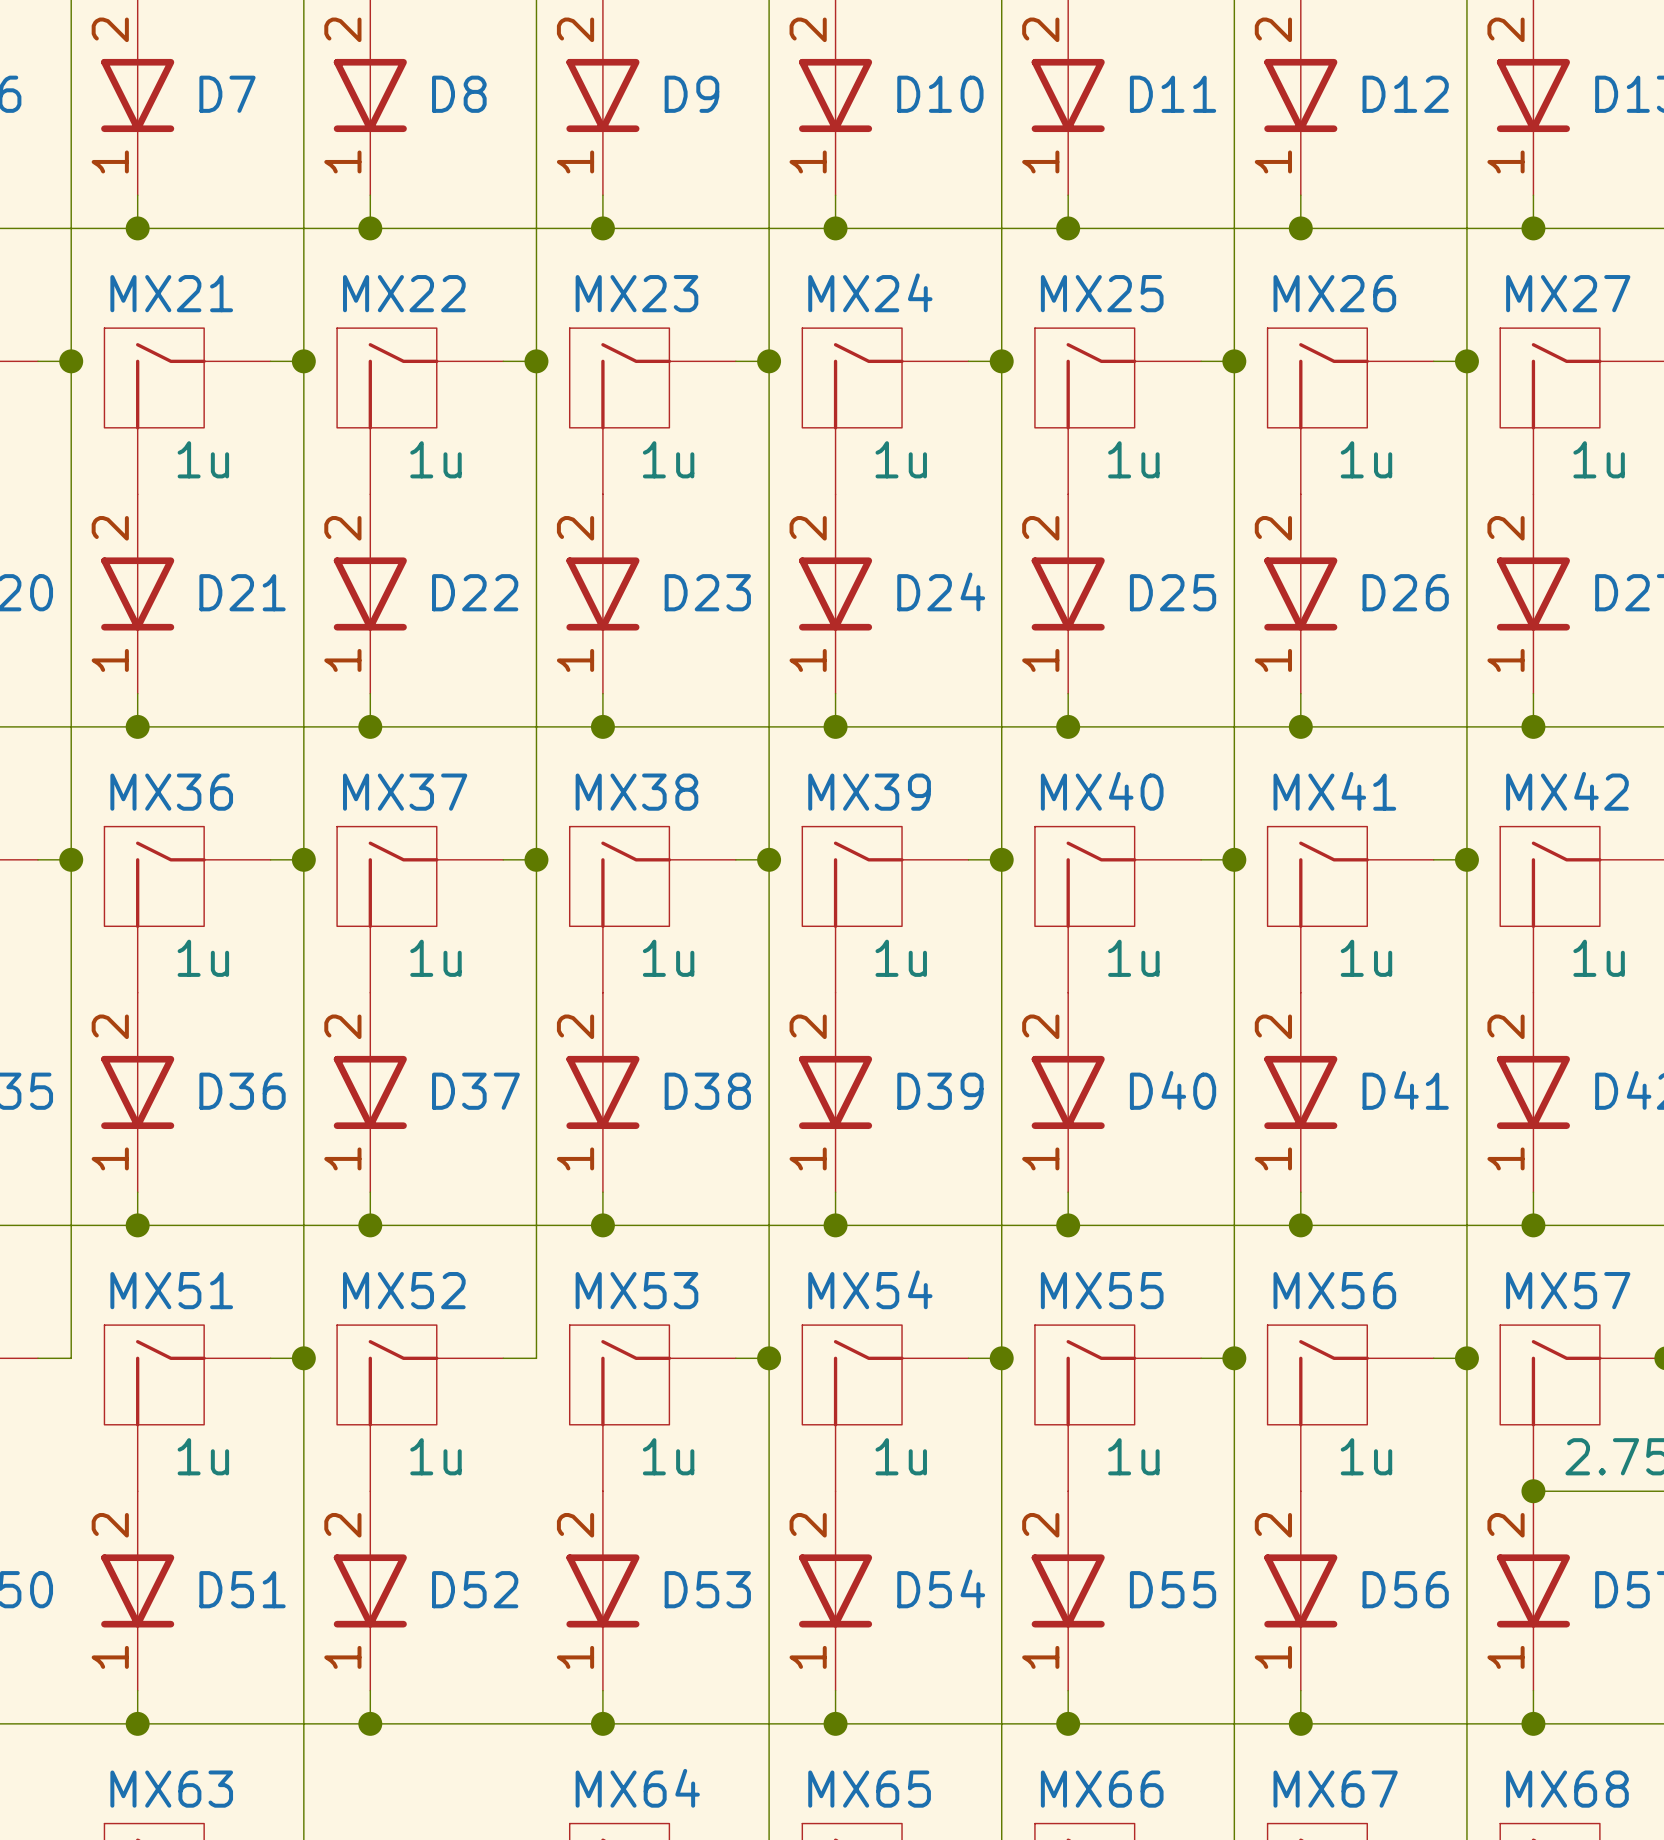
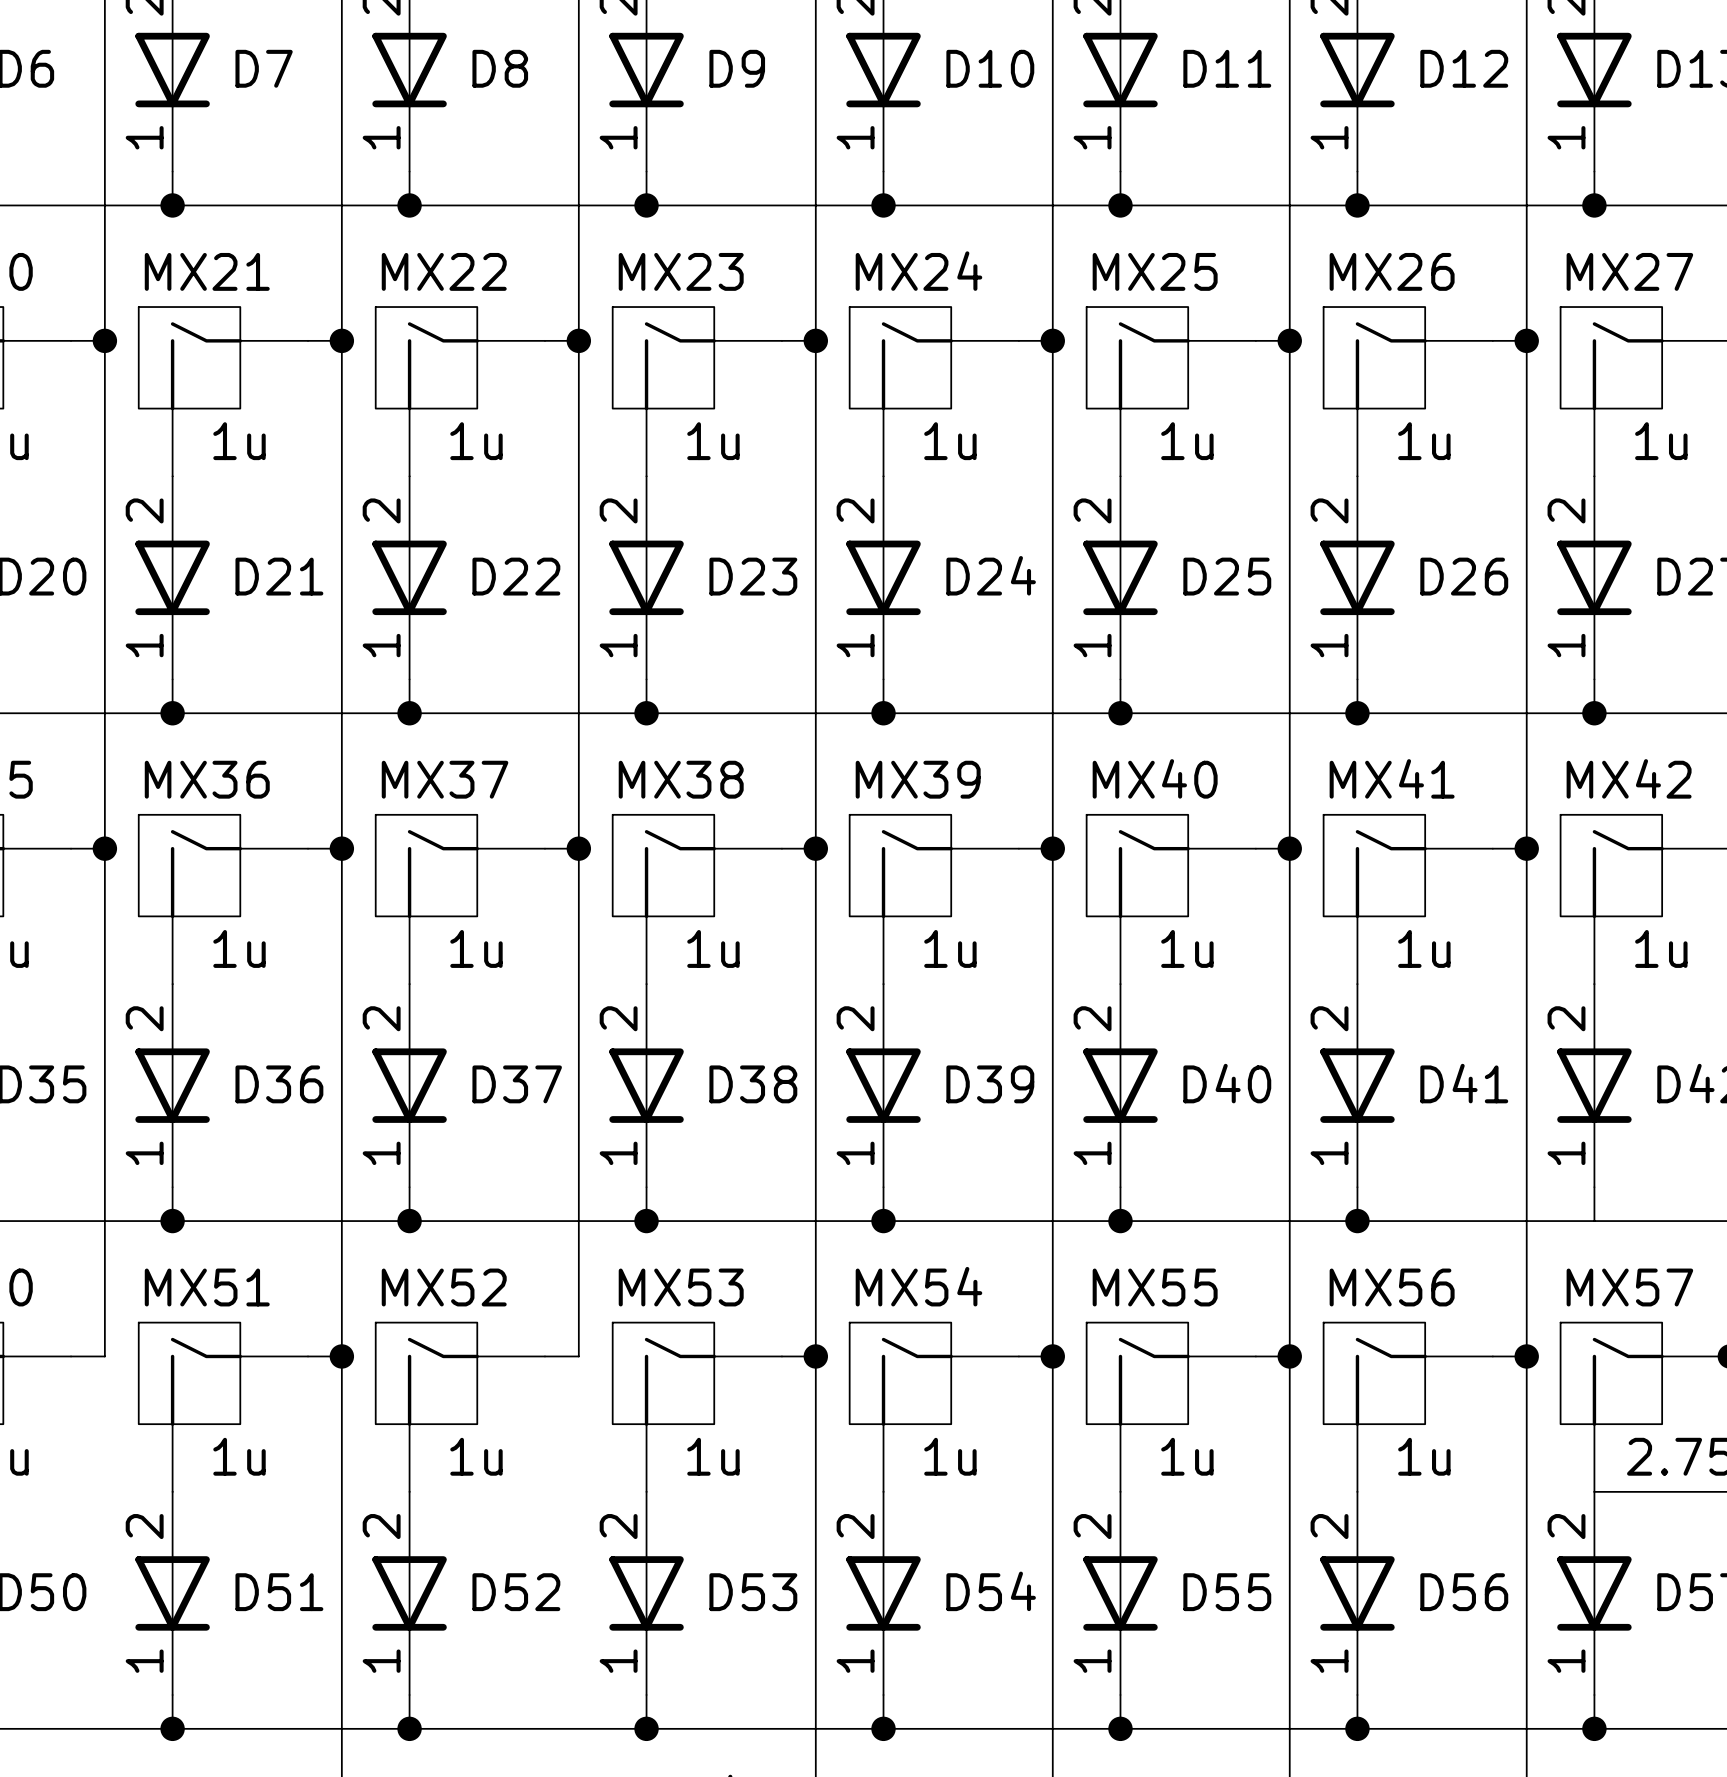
junction: (1533, 1225) -> none
junction: (1533, 1491) -> none

